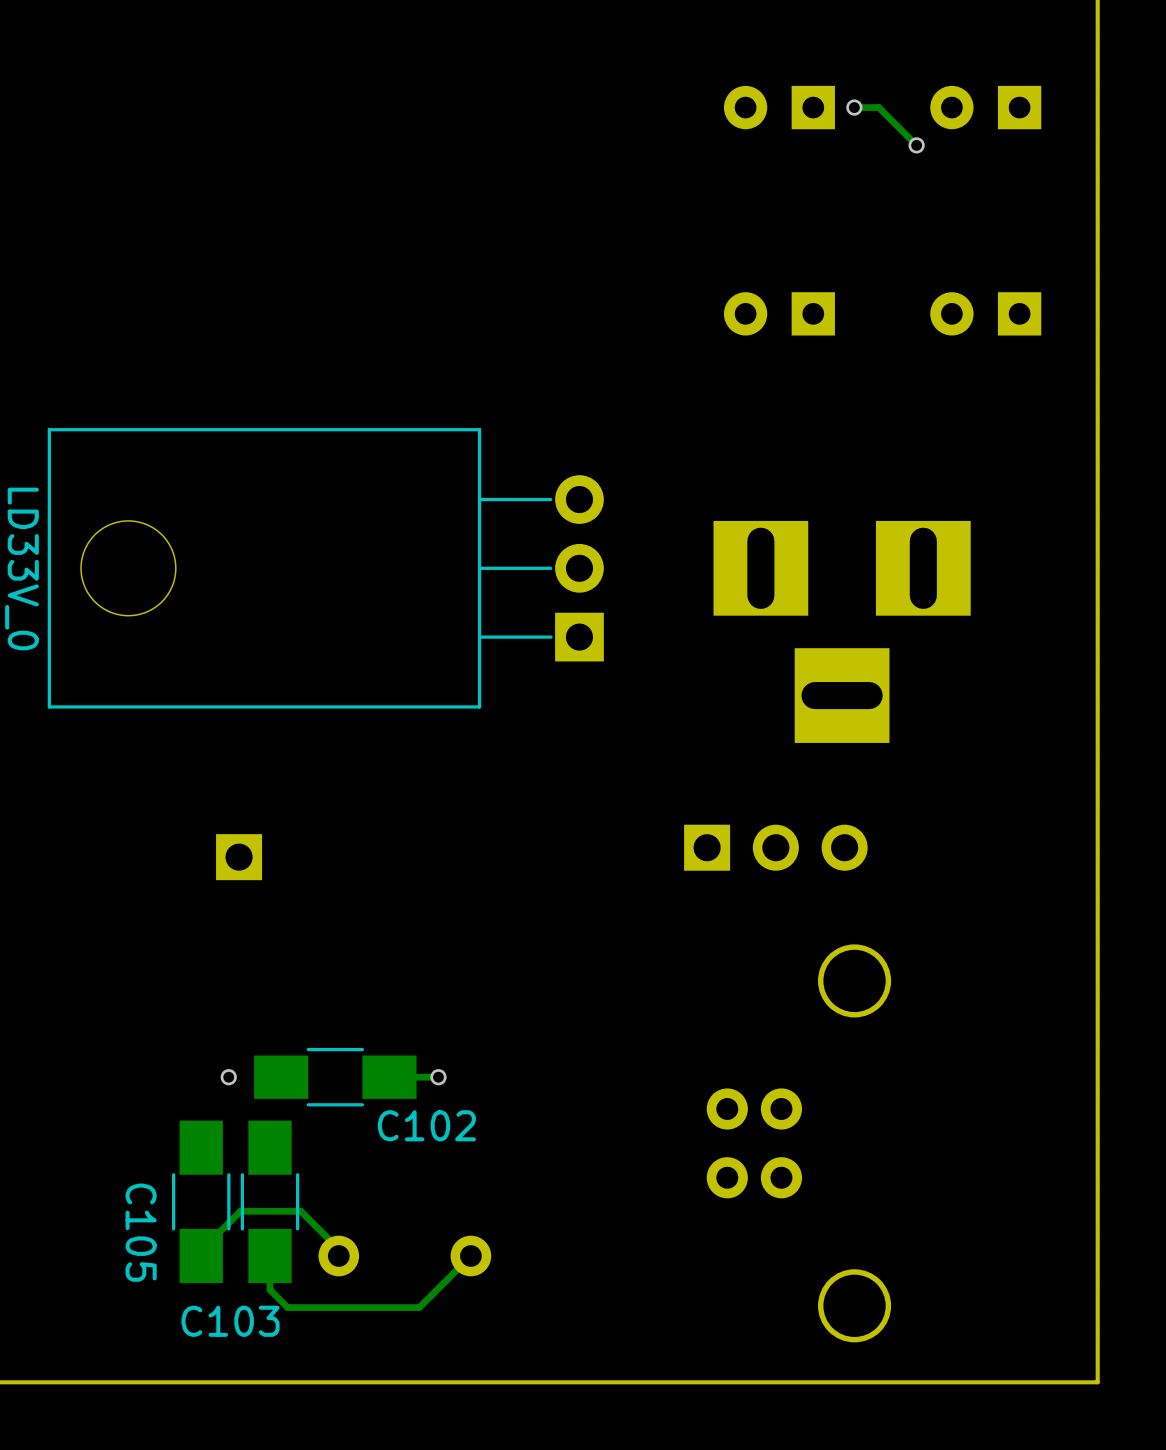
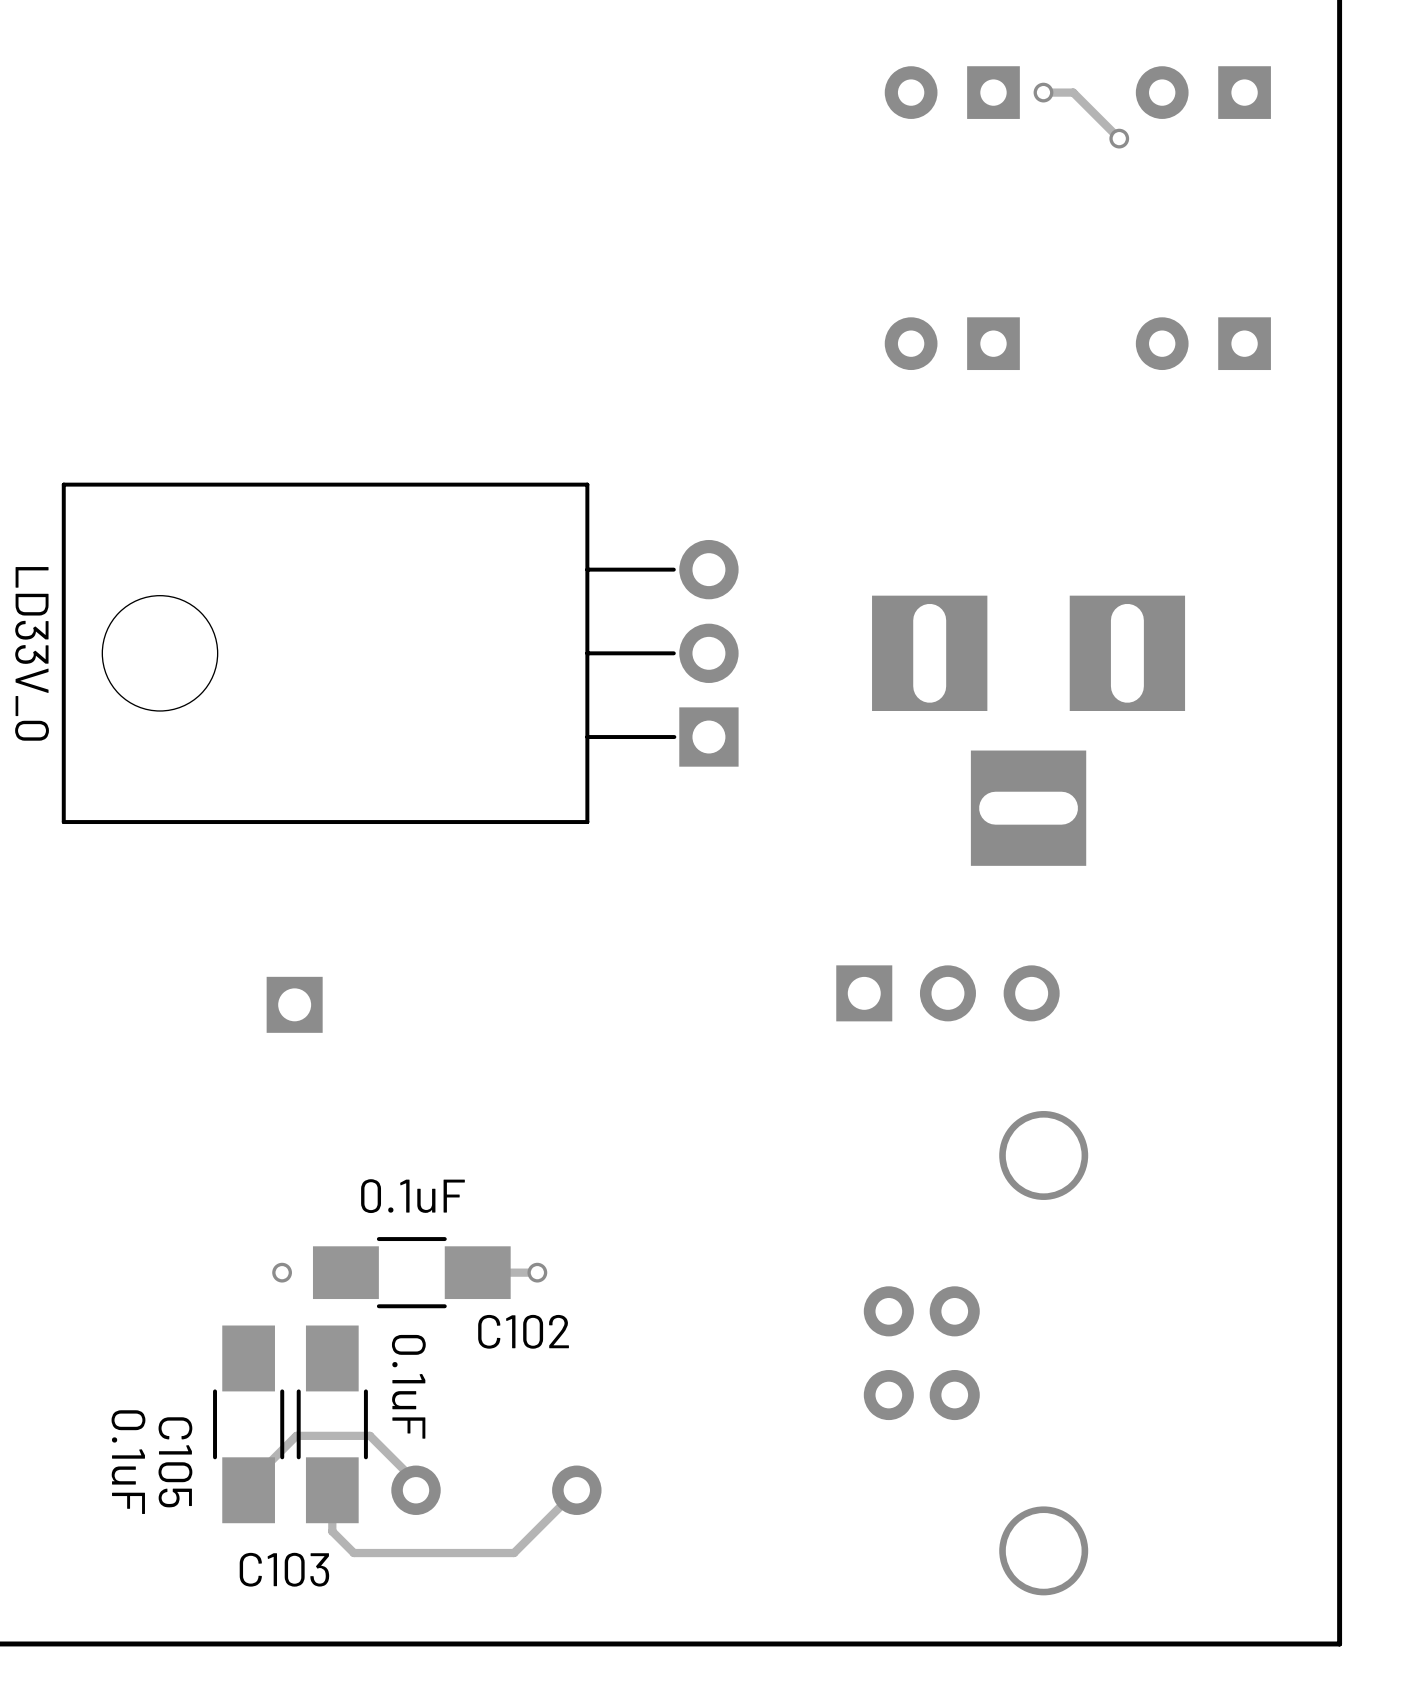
text: none -> 0.1uF (412, 1196)
text: none -> 0.1uF (408, 1386)
text: none -> 0.1uF (128, 1462)

